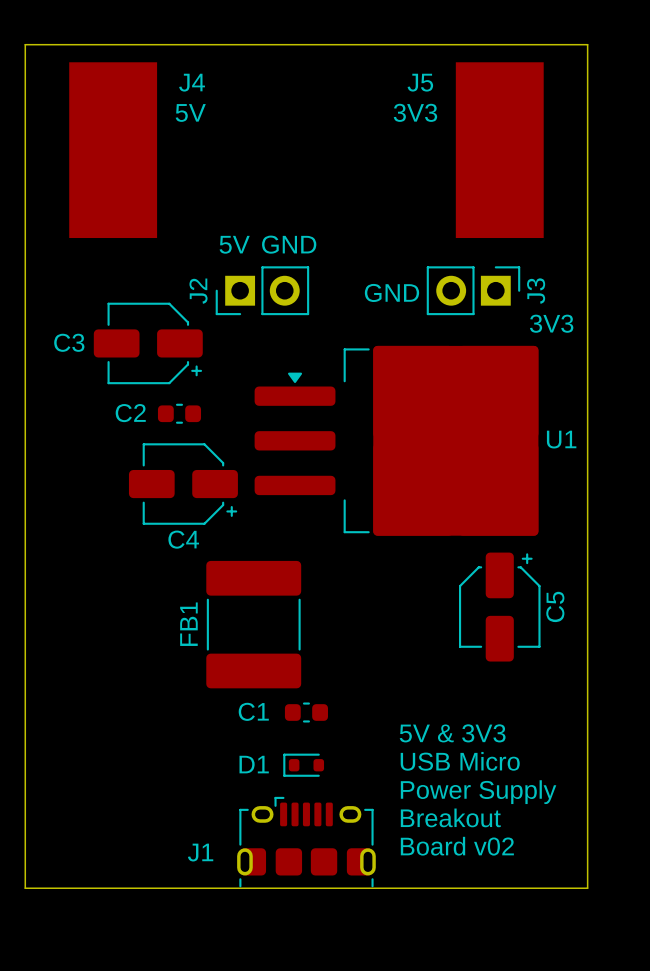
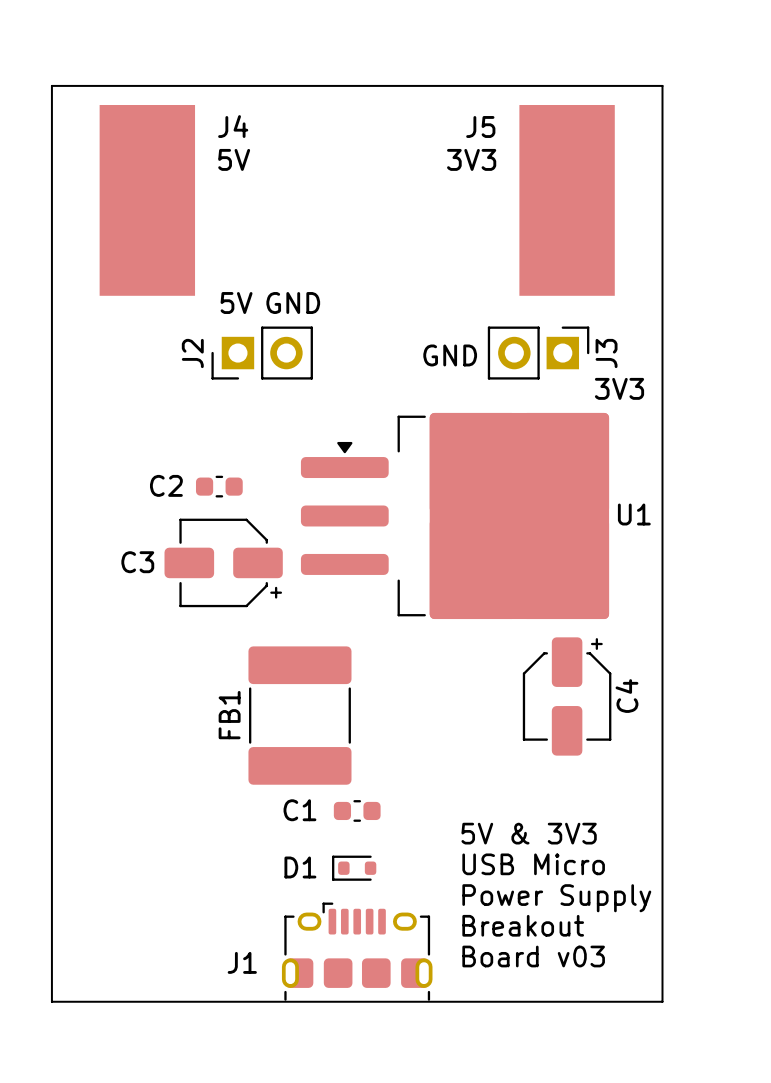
text: none -> 5V (236, 303)
text: 5V (234, 244) -> GND (293, 303)
text: GND (289, 244) -> none
J2 position: (262, 290) -> (262, 353)
C3: (148, 343) -> none
C4 name: C4 (183, 539) -> C3 (137, 562)
C5 name: C5 (555, 606) -> C4 (626, 696)
text: Board v02 (457, 846) -> Board v03 (533, 956)

